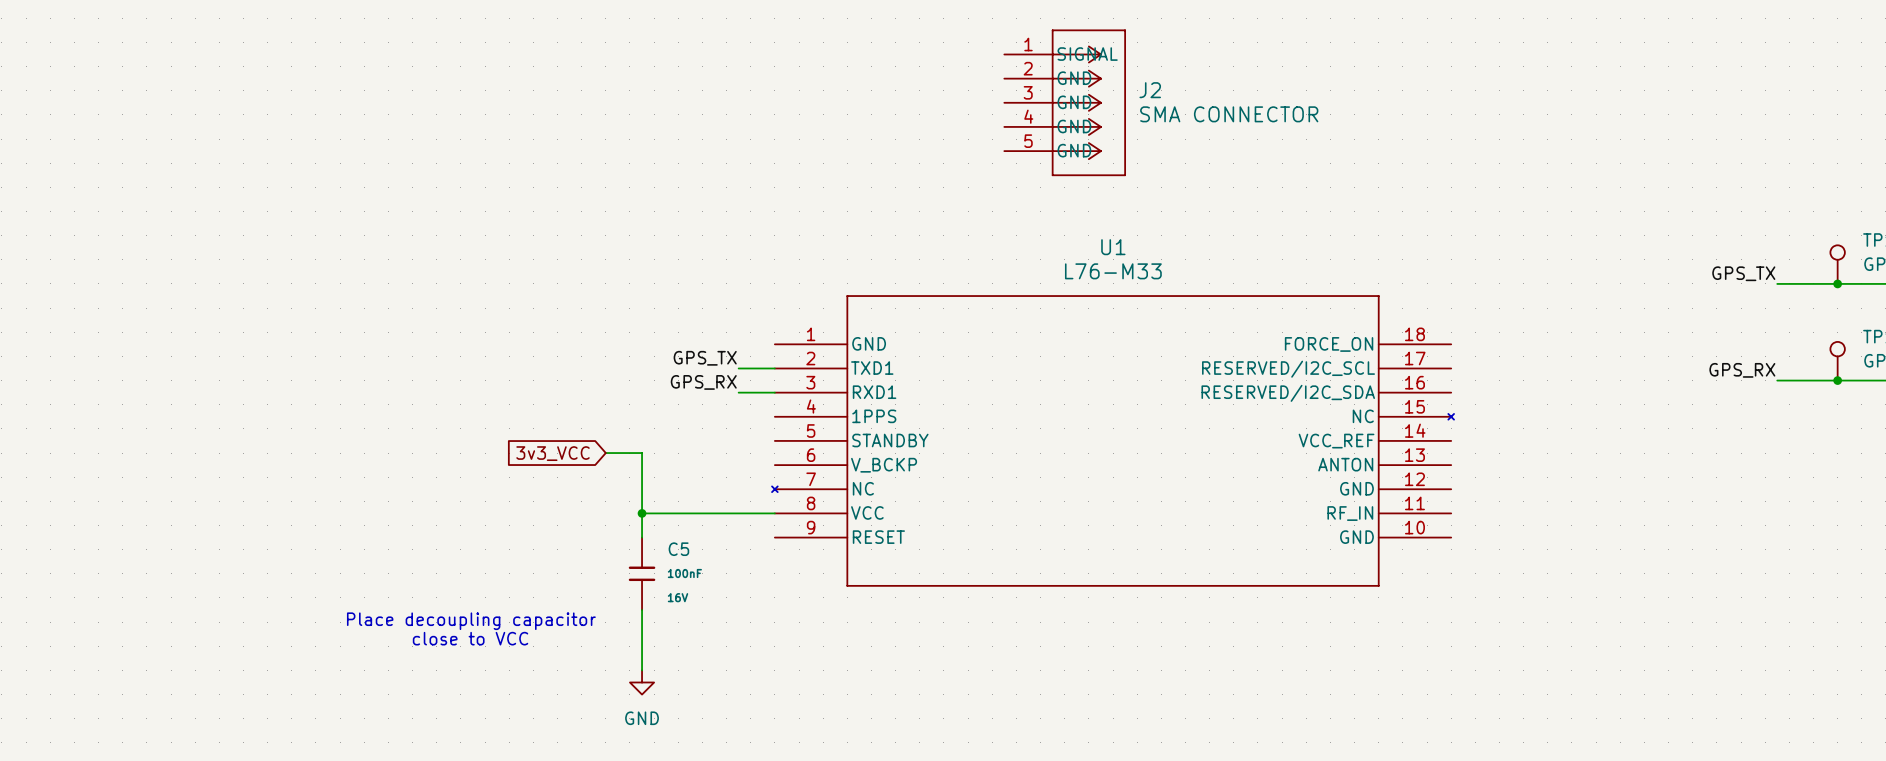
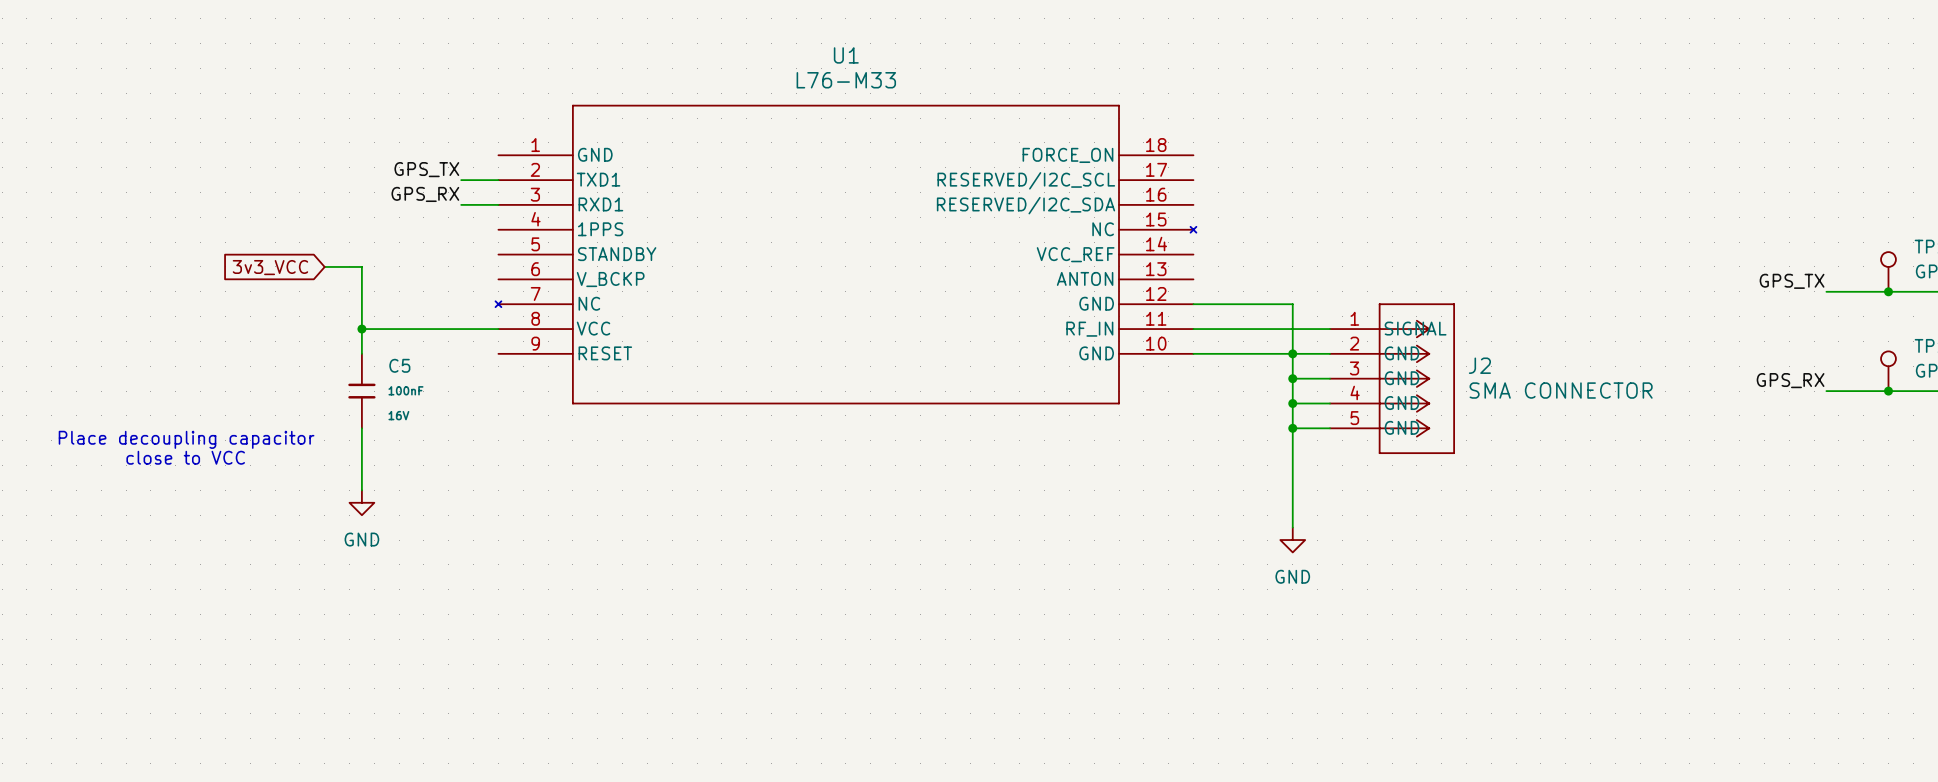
J2 position: (1065, 102) -> (1392, 378)
label: none -> GPS_TX (426, 169)
wire: none -> (461, 180) (498, 180)
label: none -> GPS_RX (425, 194)
wire: none -> (461, 204) (498, 204)
wire: none -> (324, 266) (361, 266) (361, 353)
global label: none -> 3v3_VCC (270, 267)
wire: none -> (1193, 304) (1292, 304) (1292, 527)
wire: none -> (361, 329) (498, 329)
junction: none -> (361, 329)
wire: none -> (1193, 329) (1329, 329)
wire: none -> (1193, 353) (1329, 353)
junction: none -> (1292, 353)
label: GPS_TX (705, 358) -> none
wire: (738, 368) (774, 368) -> none
wire: none -> (1292, 378) (1329, 378)
junction: none -> (1292, 378)
label: GPS_RX (703, 382) -> none
wire: none -> (1292, 403) (1329, 403)
junction: none -> (1292, 403)
wire: none -> (361, 428) (361, 490)
wire: none -> (1292, 428) (1329, 428)
junction: none -> (1292, 428)
text: none -> Place decoupling capacitor (186, 439)
U1 position: (1113, 440) -> (845, 254)
text: none -> close to VCC (185, 457)
global label: 3v3_VCC (553, 453) -> none
wire: (605, 453) (642, 453) (642, 537) -> none
power symbol: none -> GND (361, 502)
wire: (642, 513) (774, 513) -> none
junction: (642, 513) -> none
power symbol: none -> GND (1292, 540)
C5 position: (642, 573) -> (361, 391)
wire: (642, 610) (642, 670) -> none
text: Place decoupling capacitor (471, 621) -> none
text: close to VCC (470, 638) -> none
power symbol: GND (642, 682) -> none

